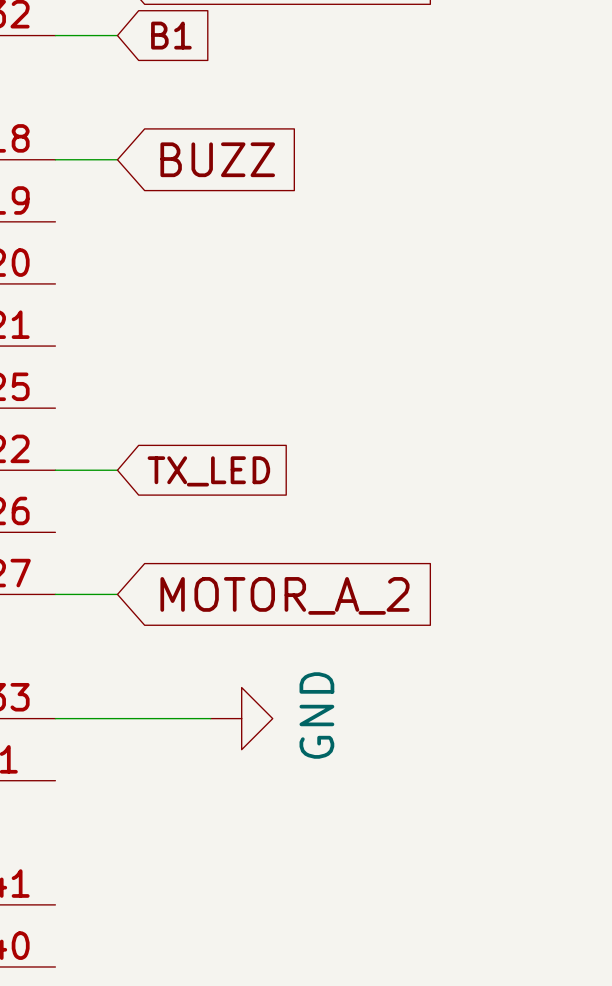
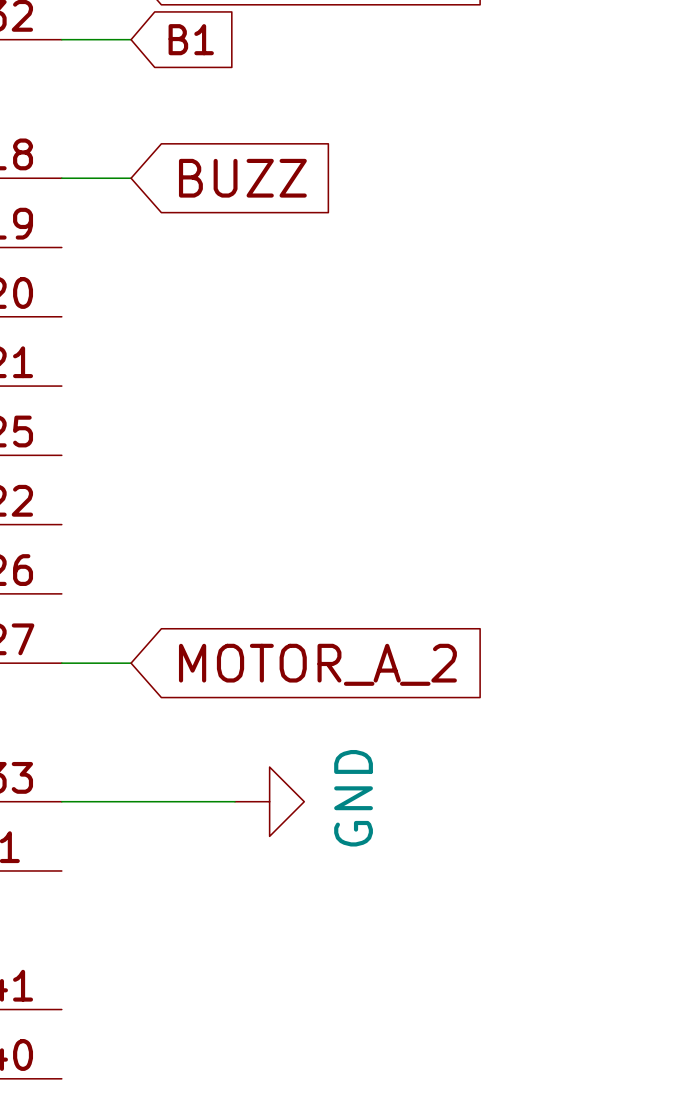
wire: (55, 470) (117, 470) -> none
global label: TX_LED (208, 471) -> none

